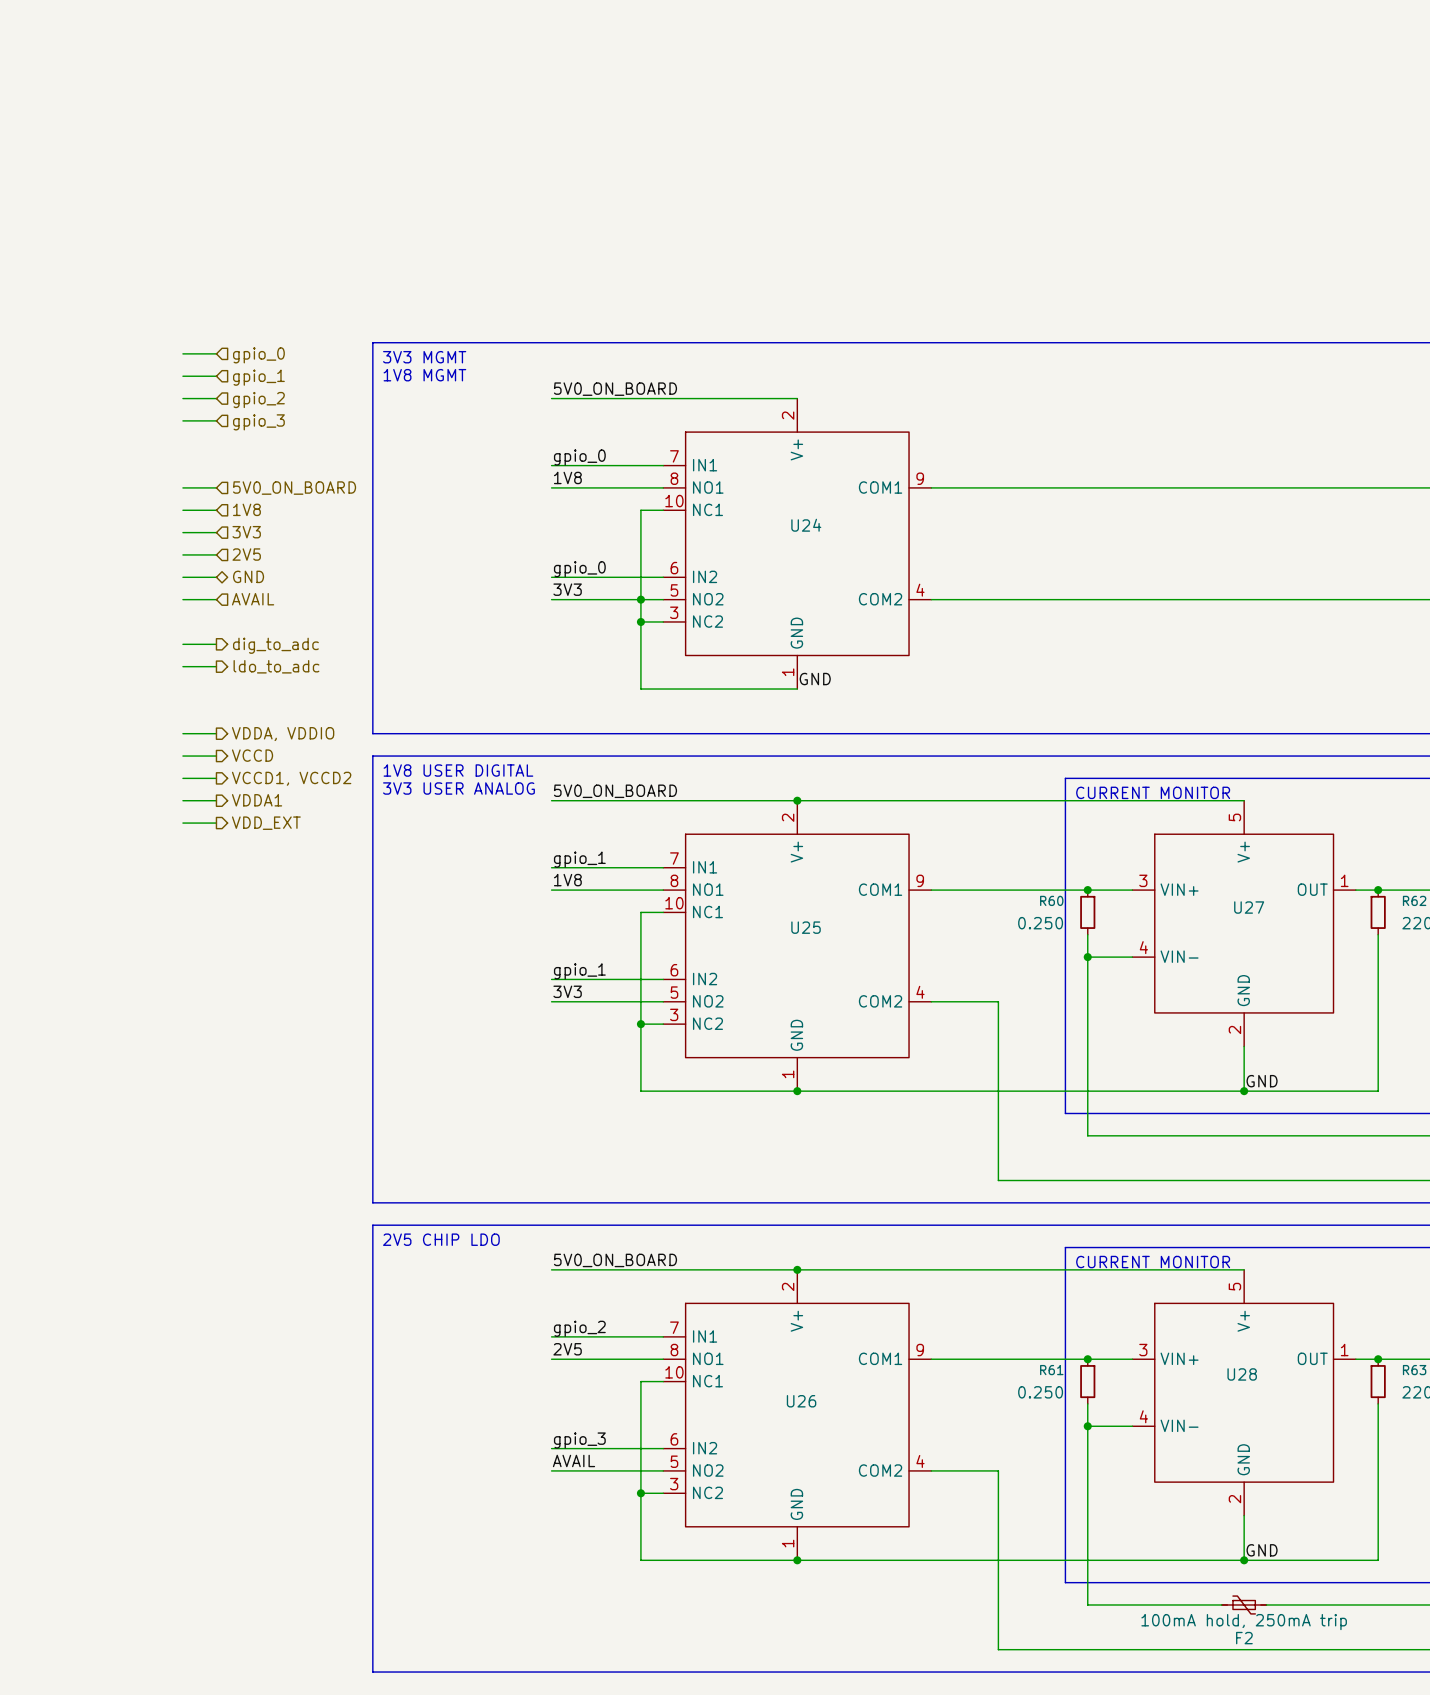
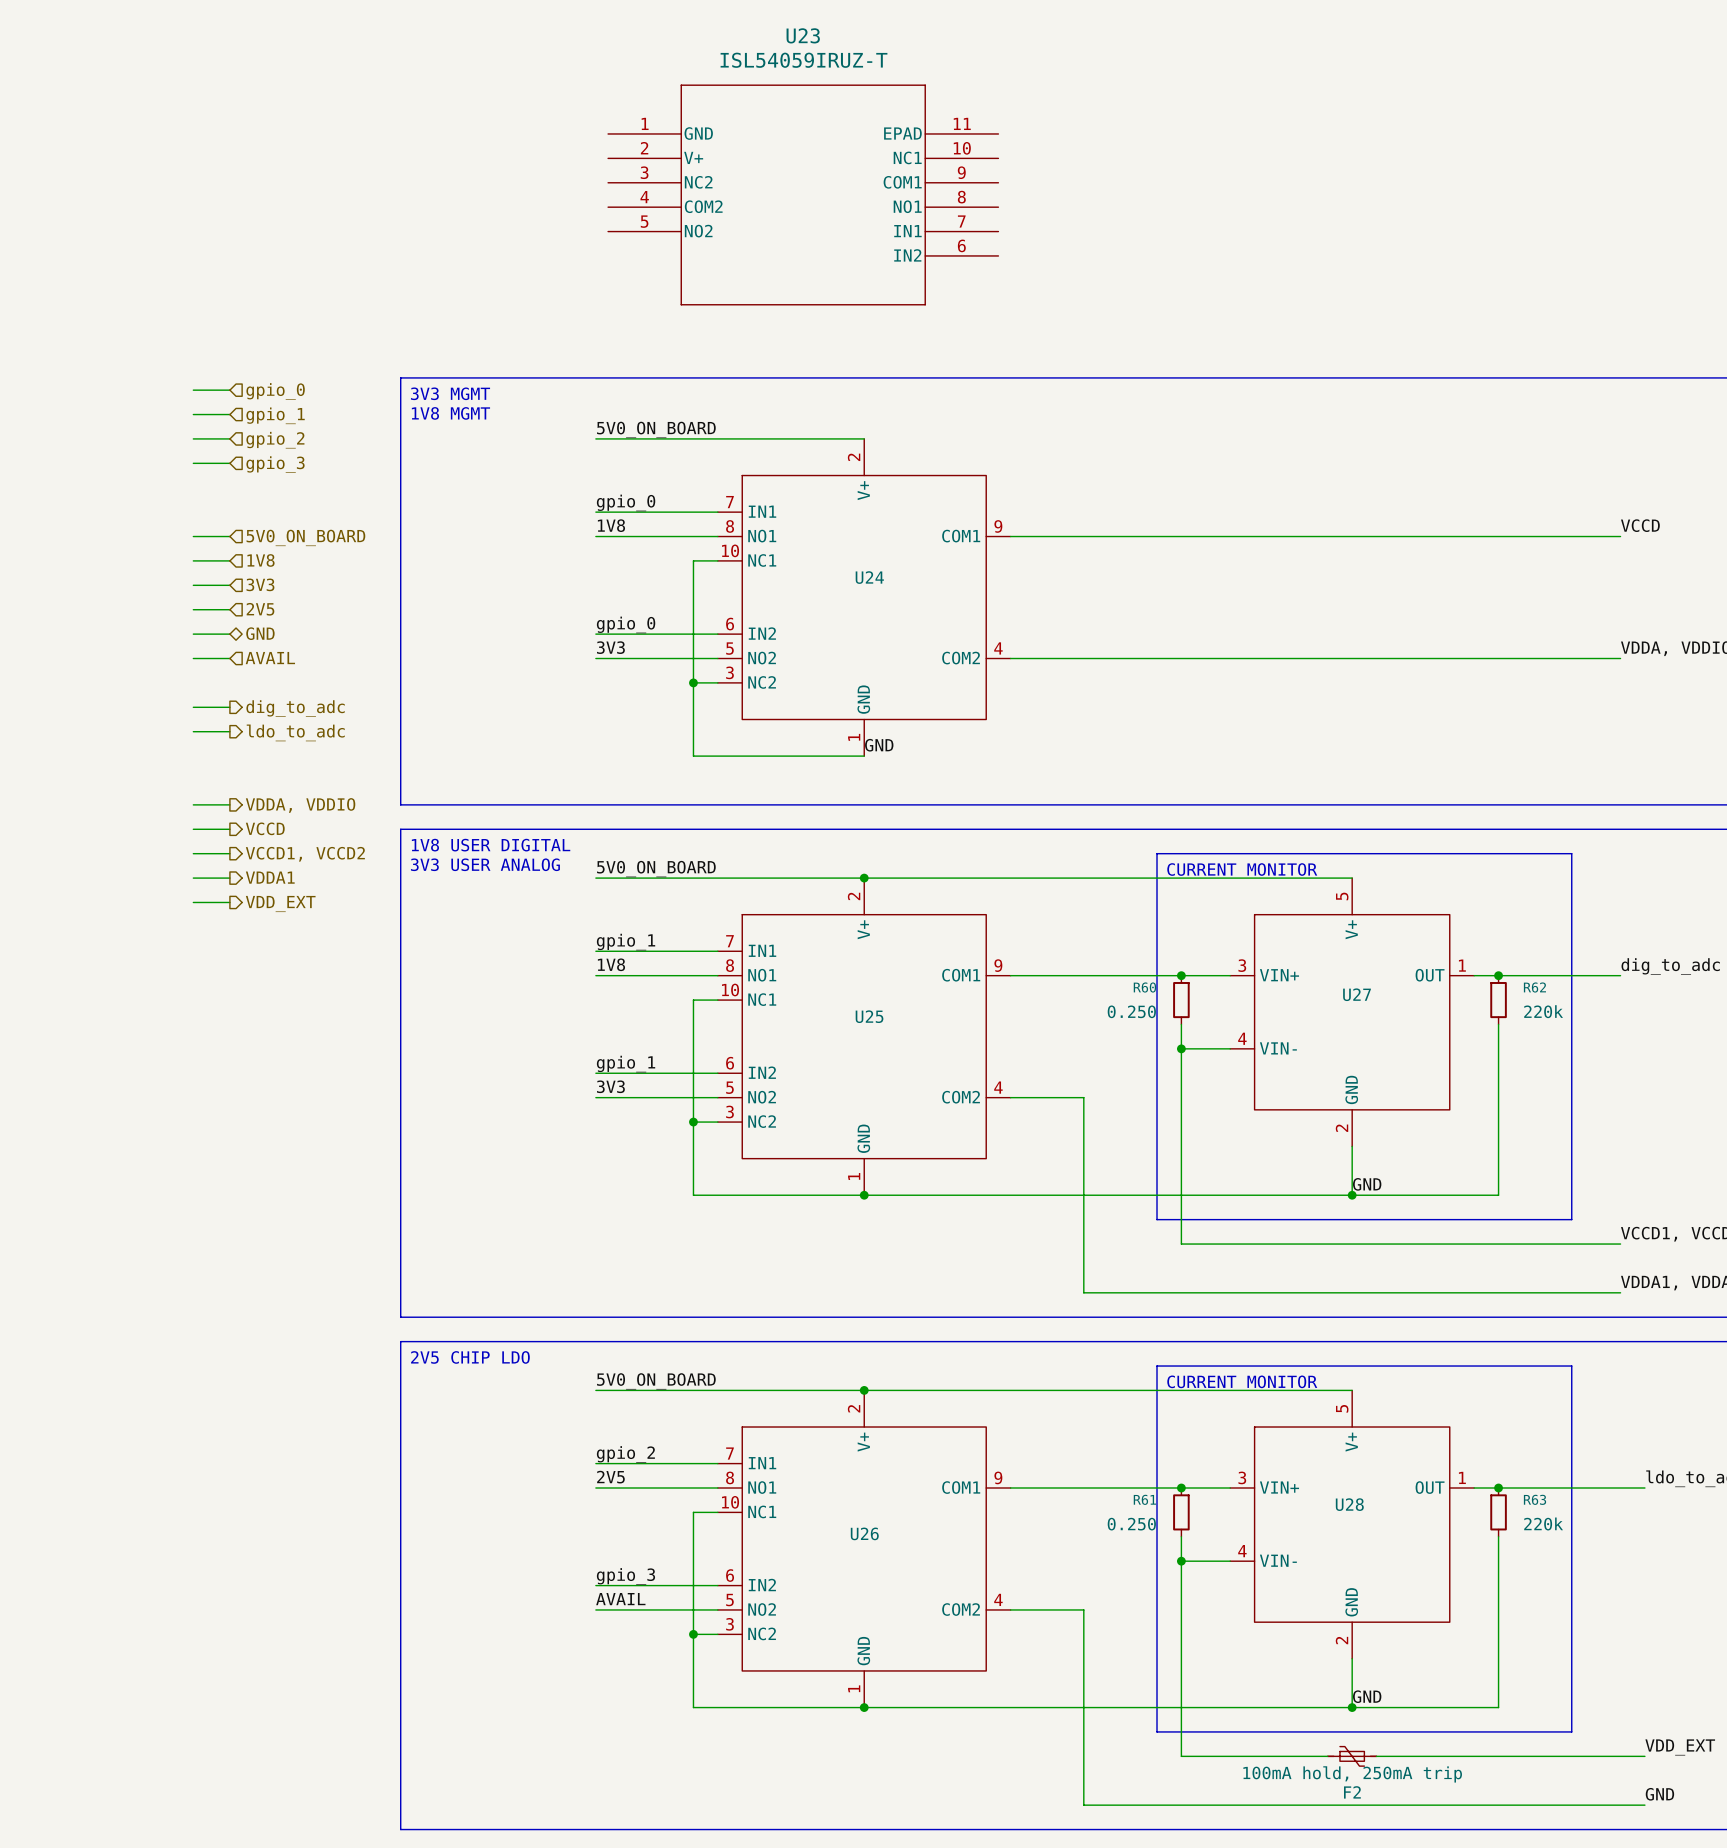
U23: none -> ISL54059IRUZ-T (803, 194)
junction: (640, 599) -> none

